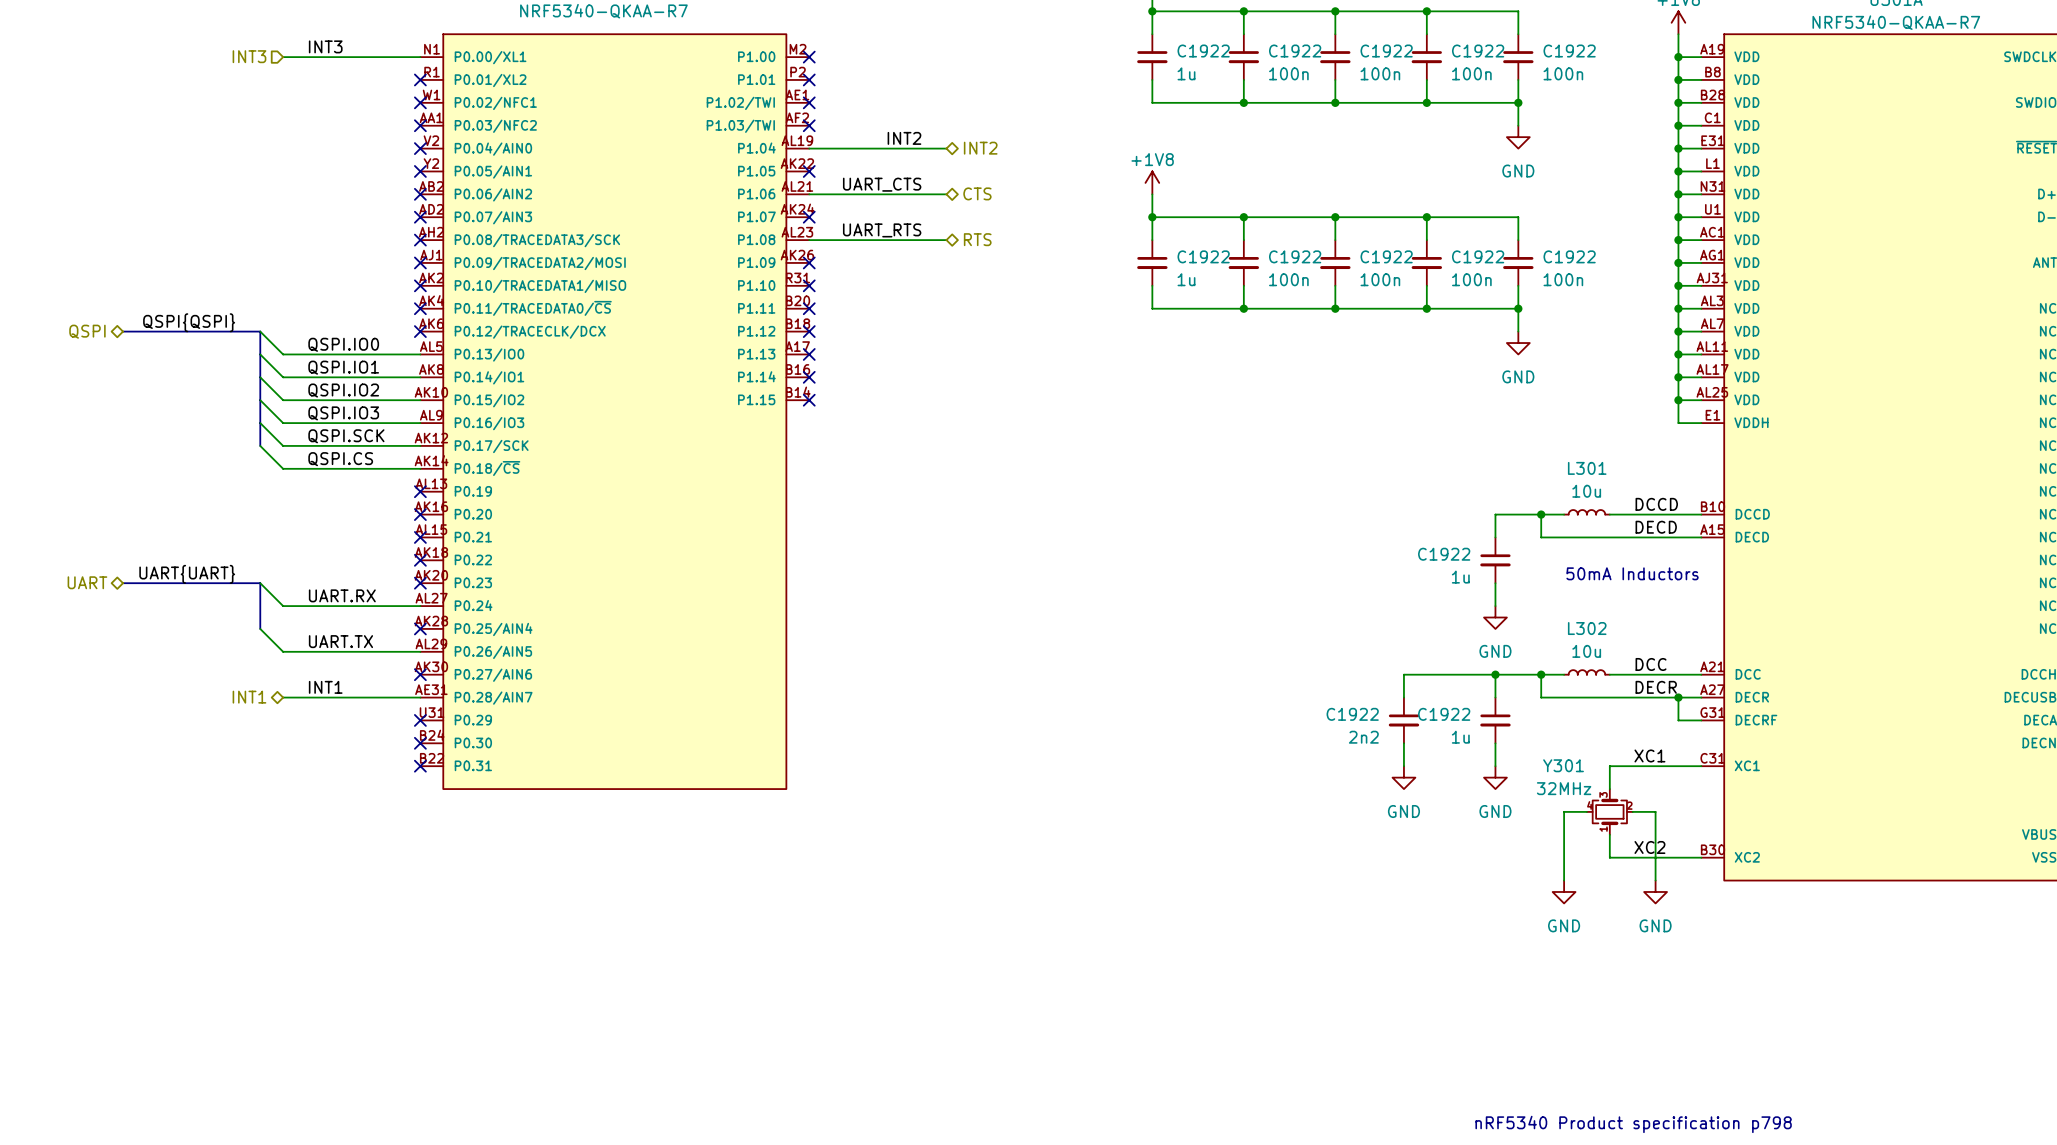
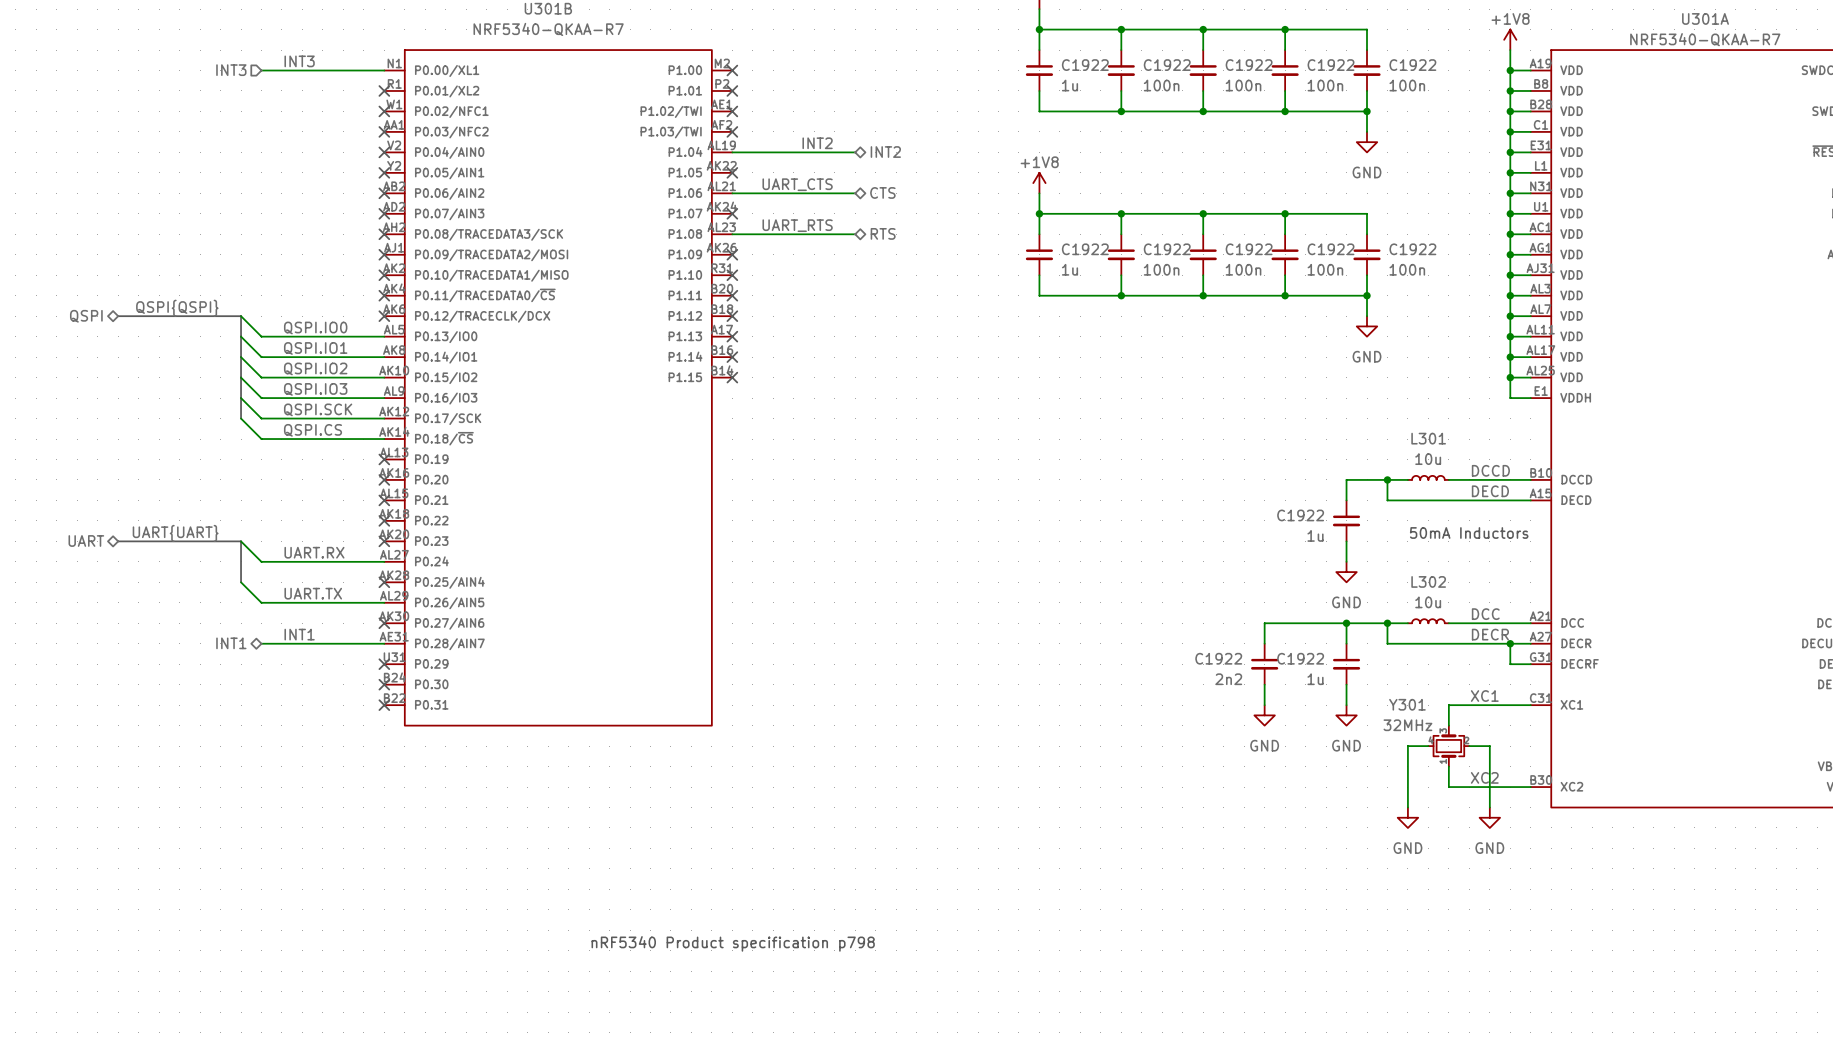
text: none -> nRF5340 Product specification p798 (733, 943)
text: nRF5340 Product specification p798 (1633, 1124) -> none

